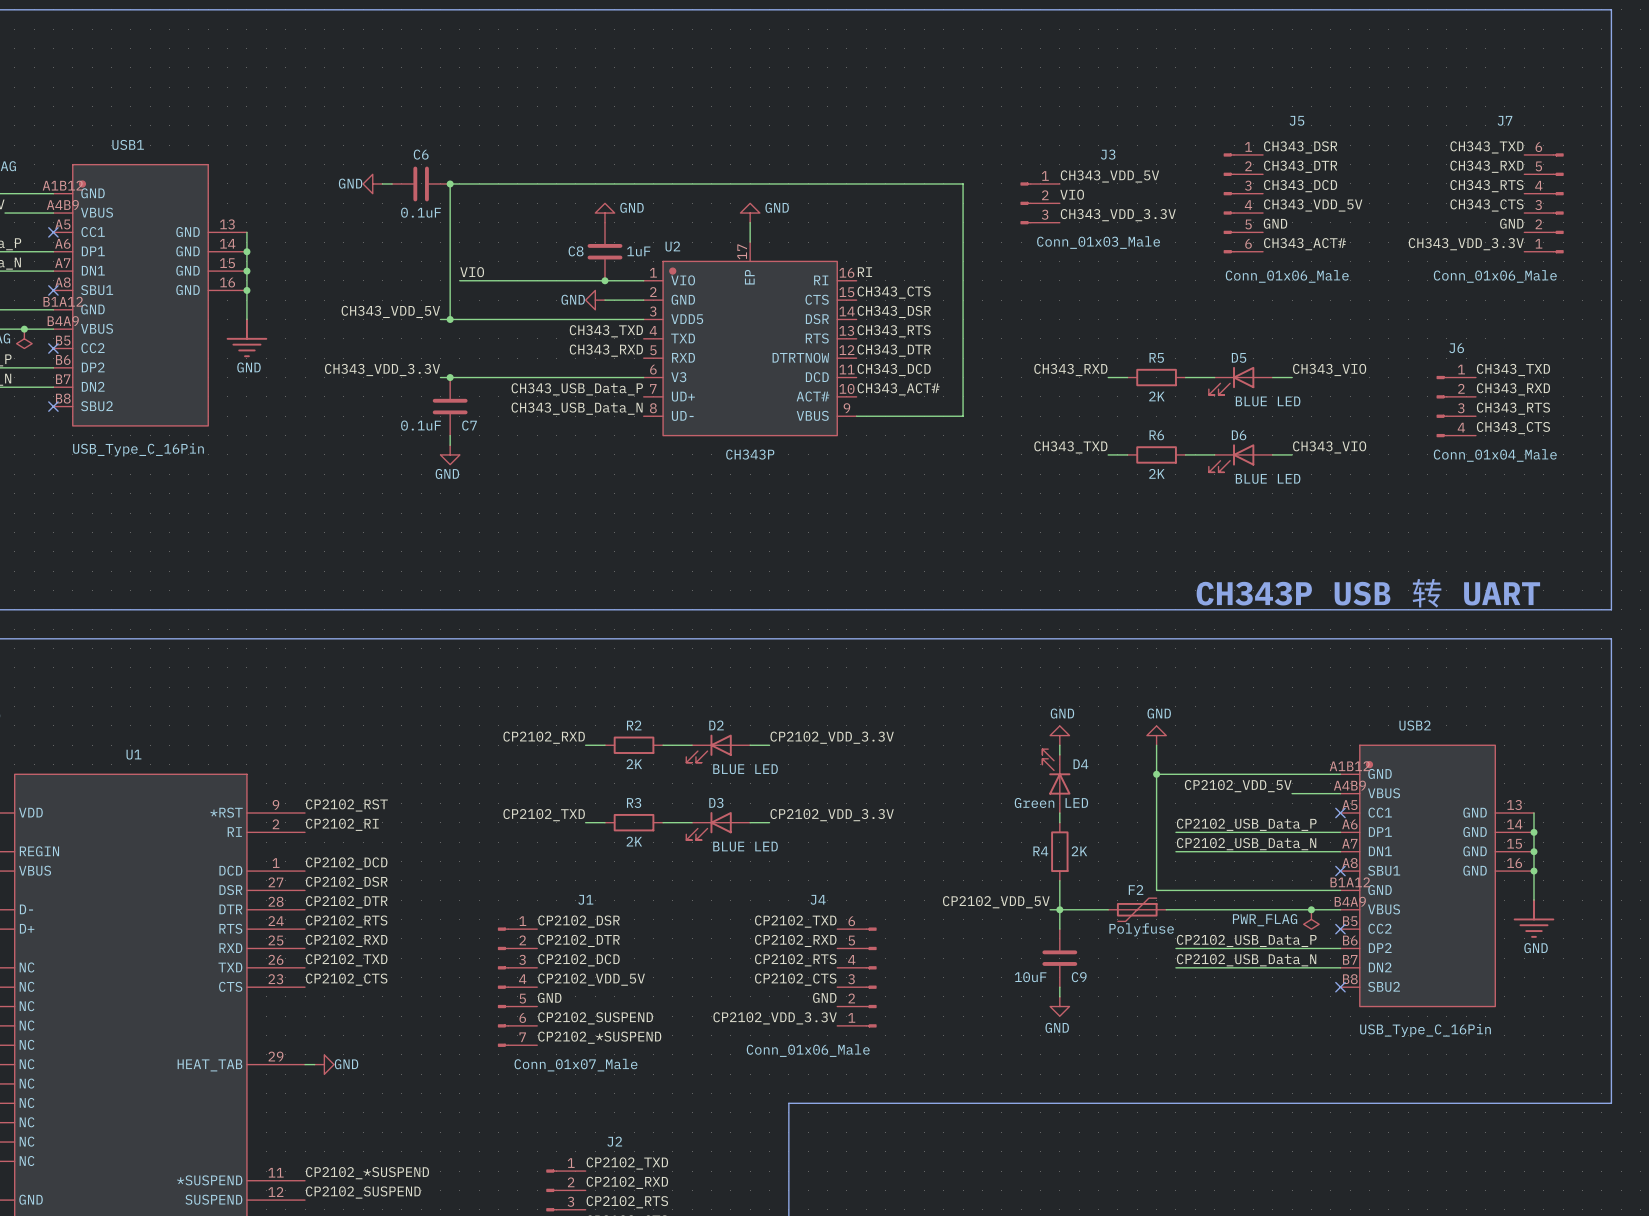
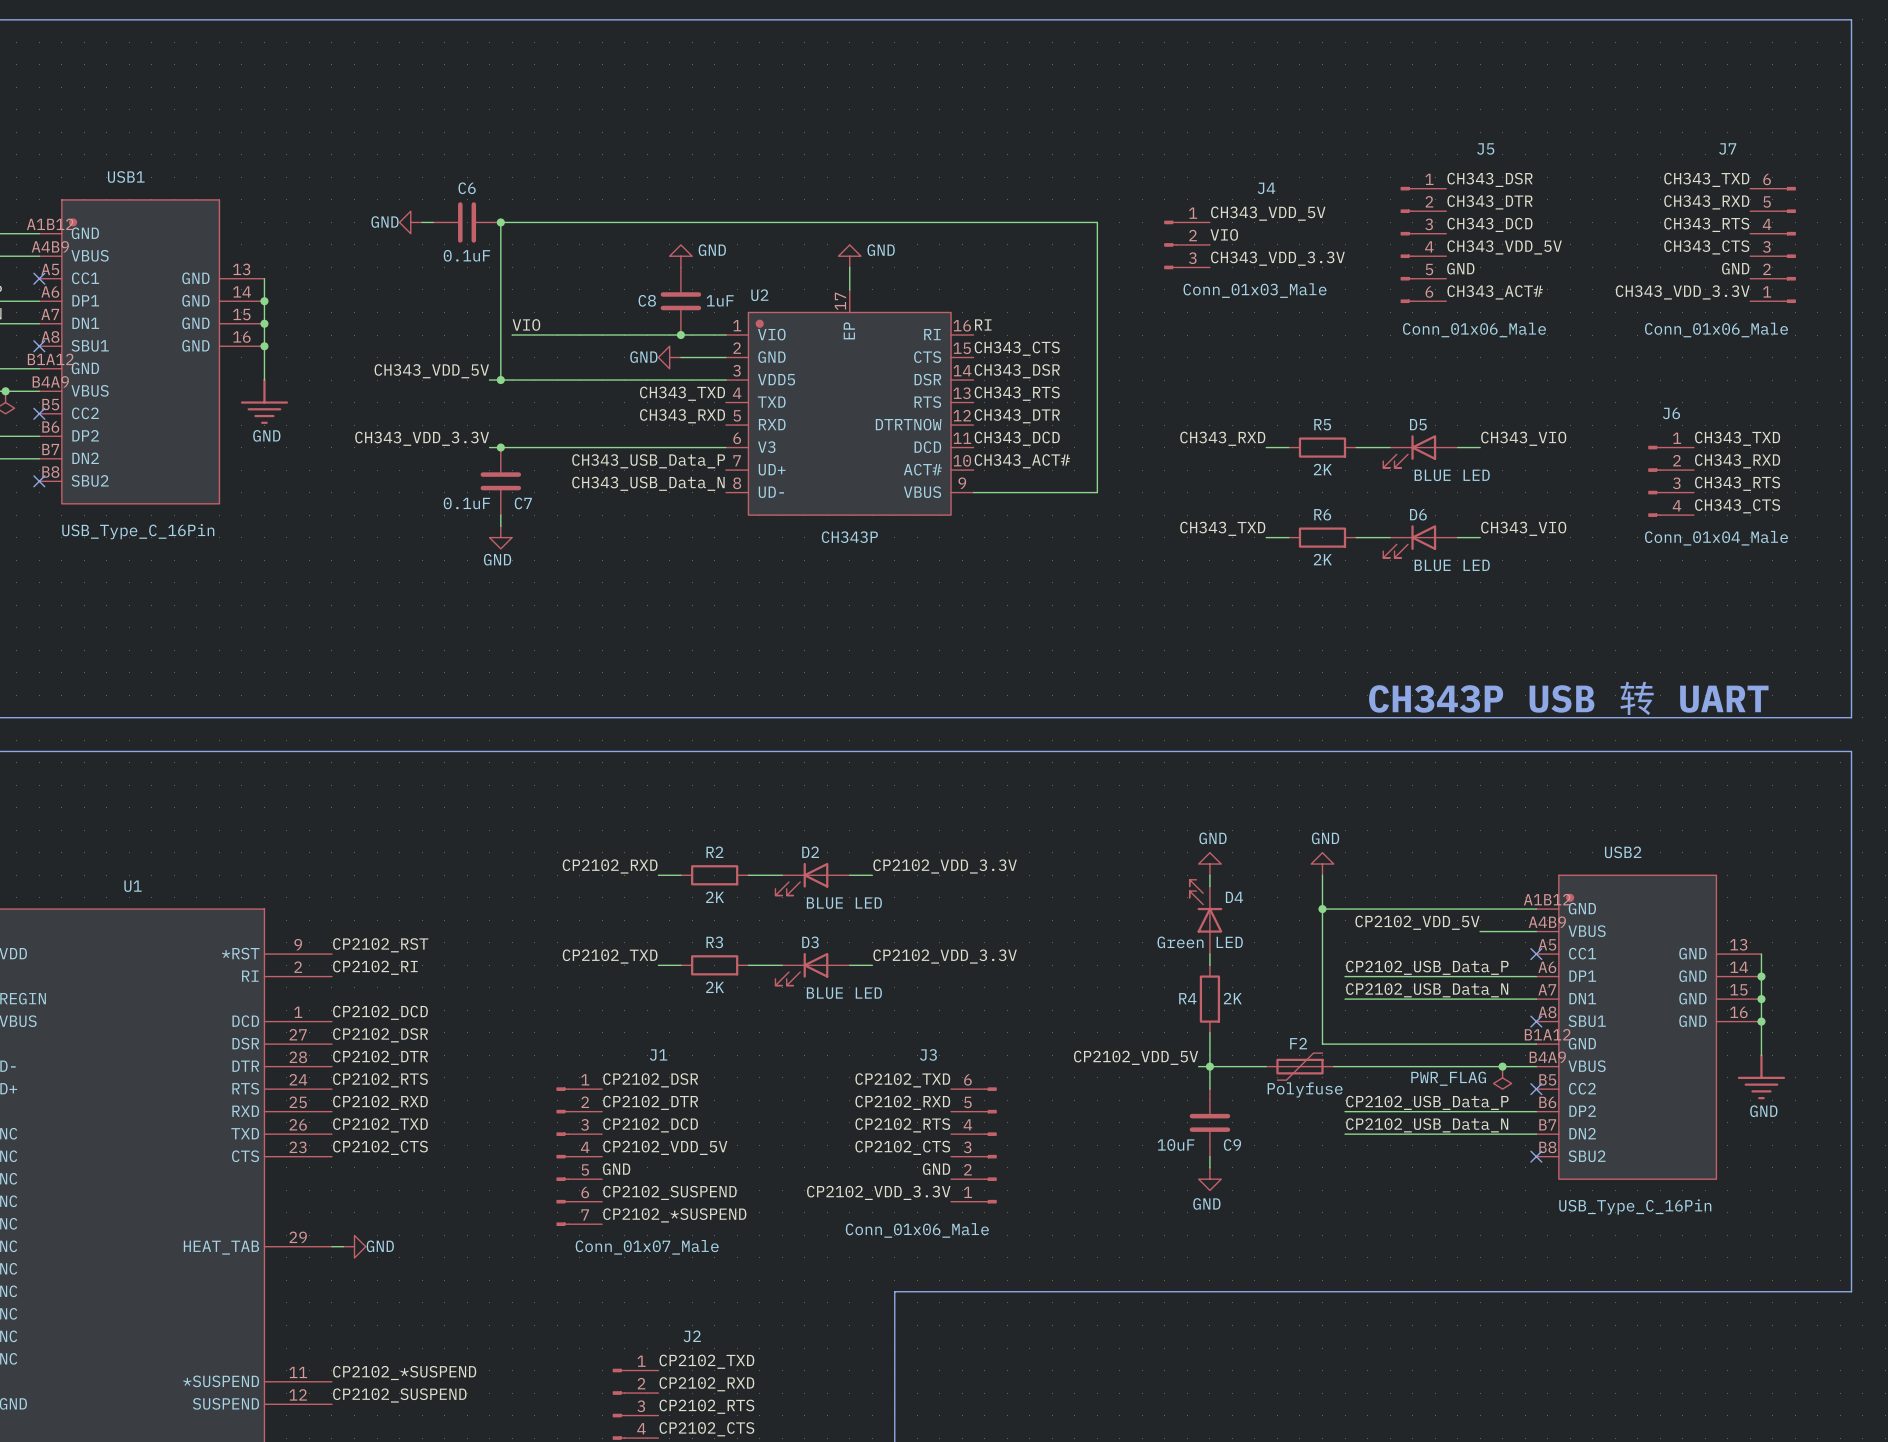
J3 name: J3 (1108, 154) -> J4 (1266, 188)
J4 name: J4 (818, 899) -> J3 (928, 1054)

